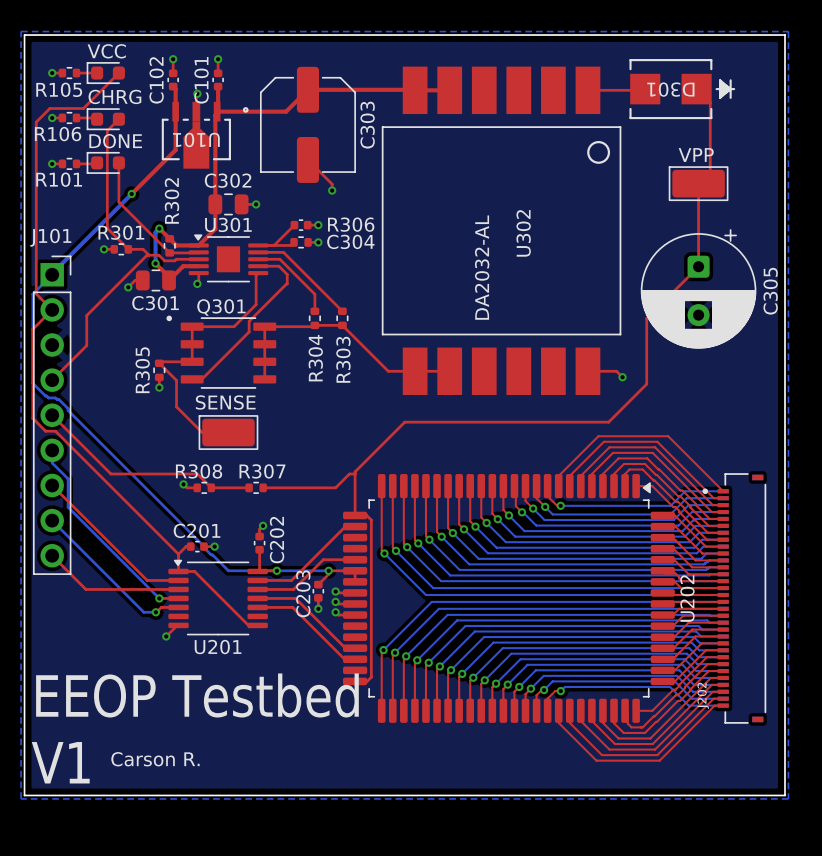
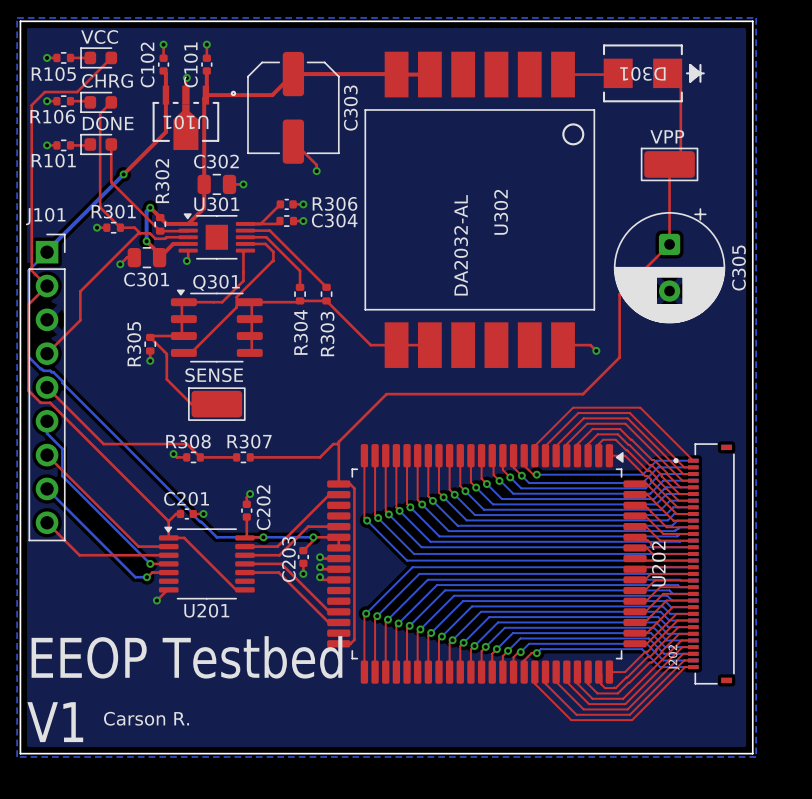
Q301 footprint: [166, 315, 277, 389] -> [170, 289, 263, 363]

